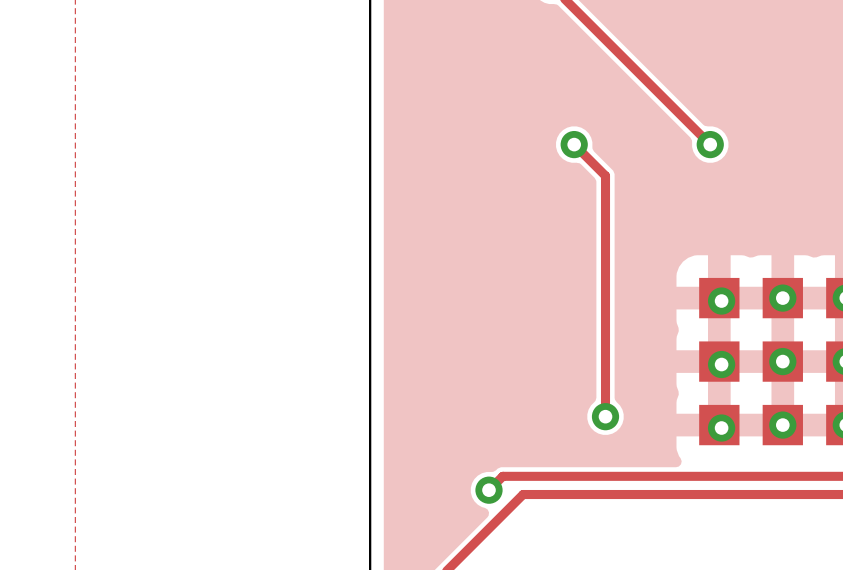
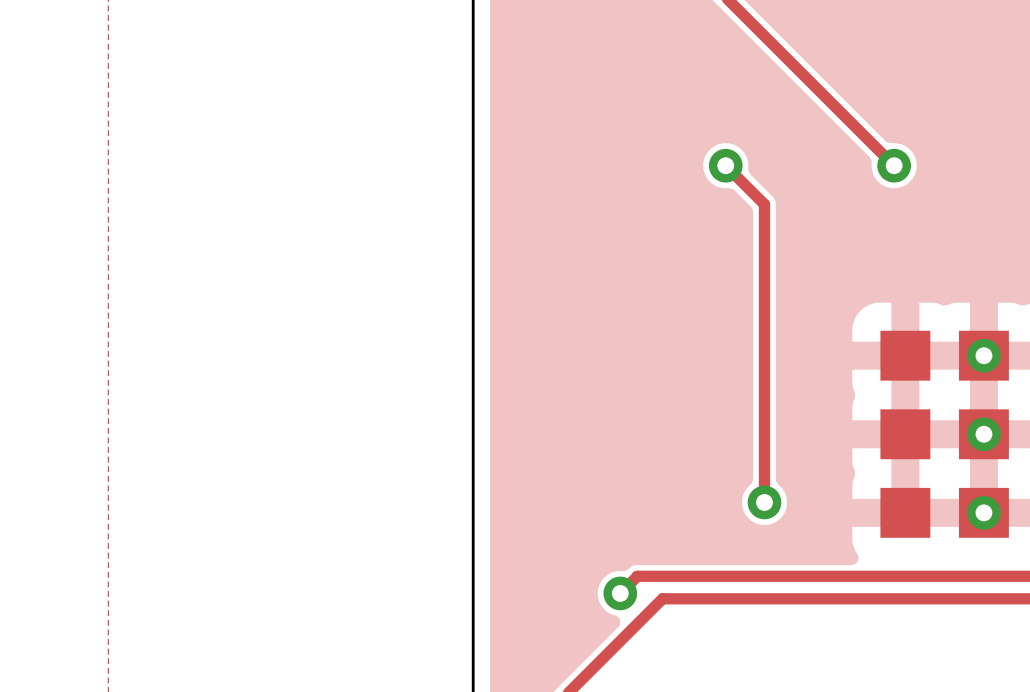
via: (721, 301) -> none
via: (721, 364) -> none
via: (721, 428) -> none

